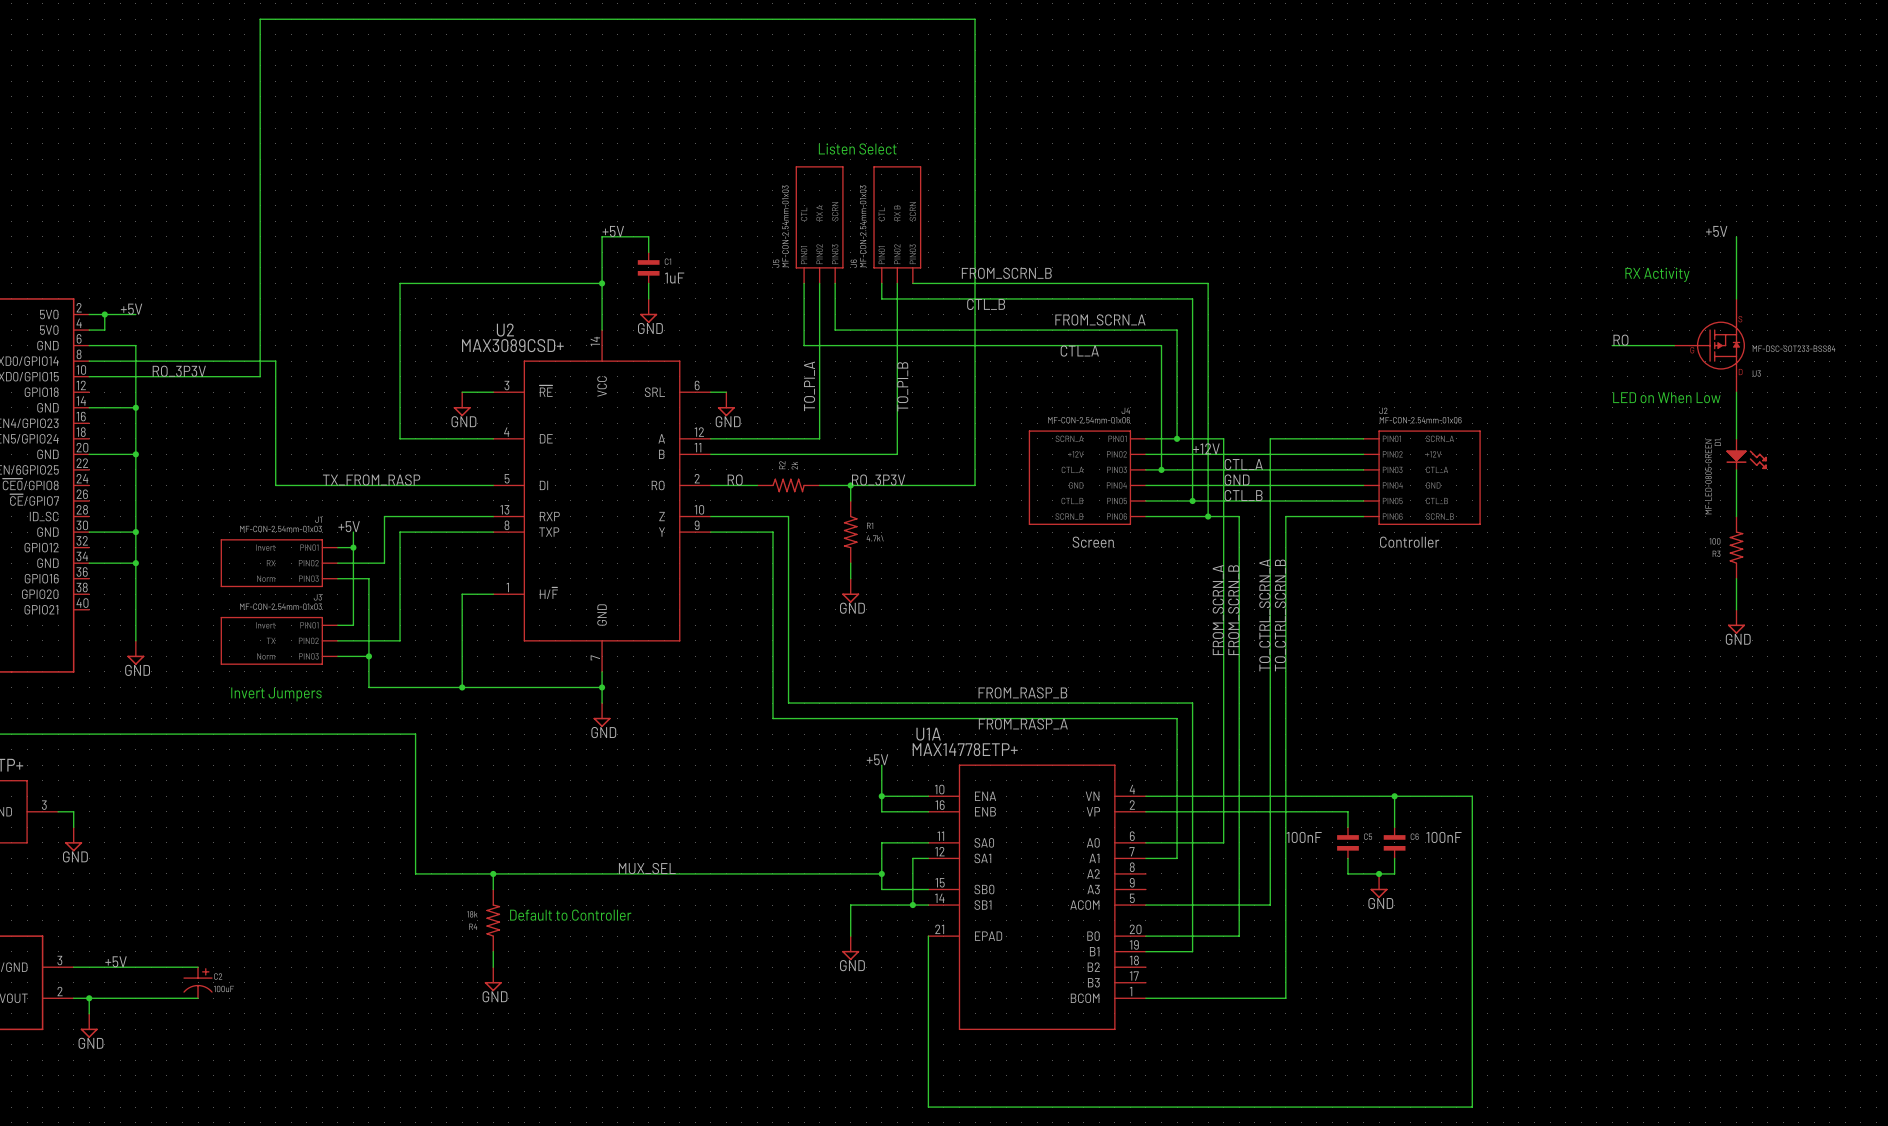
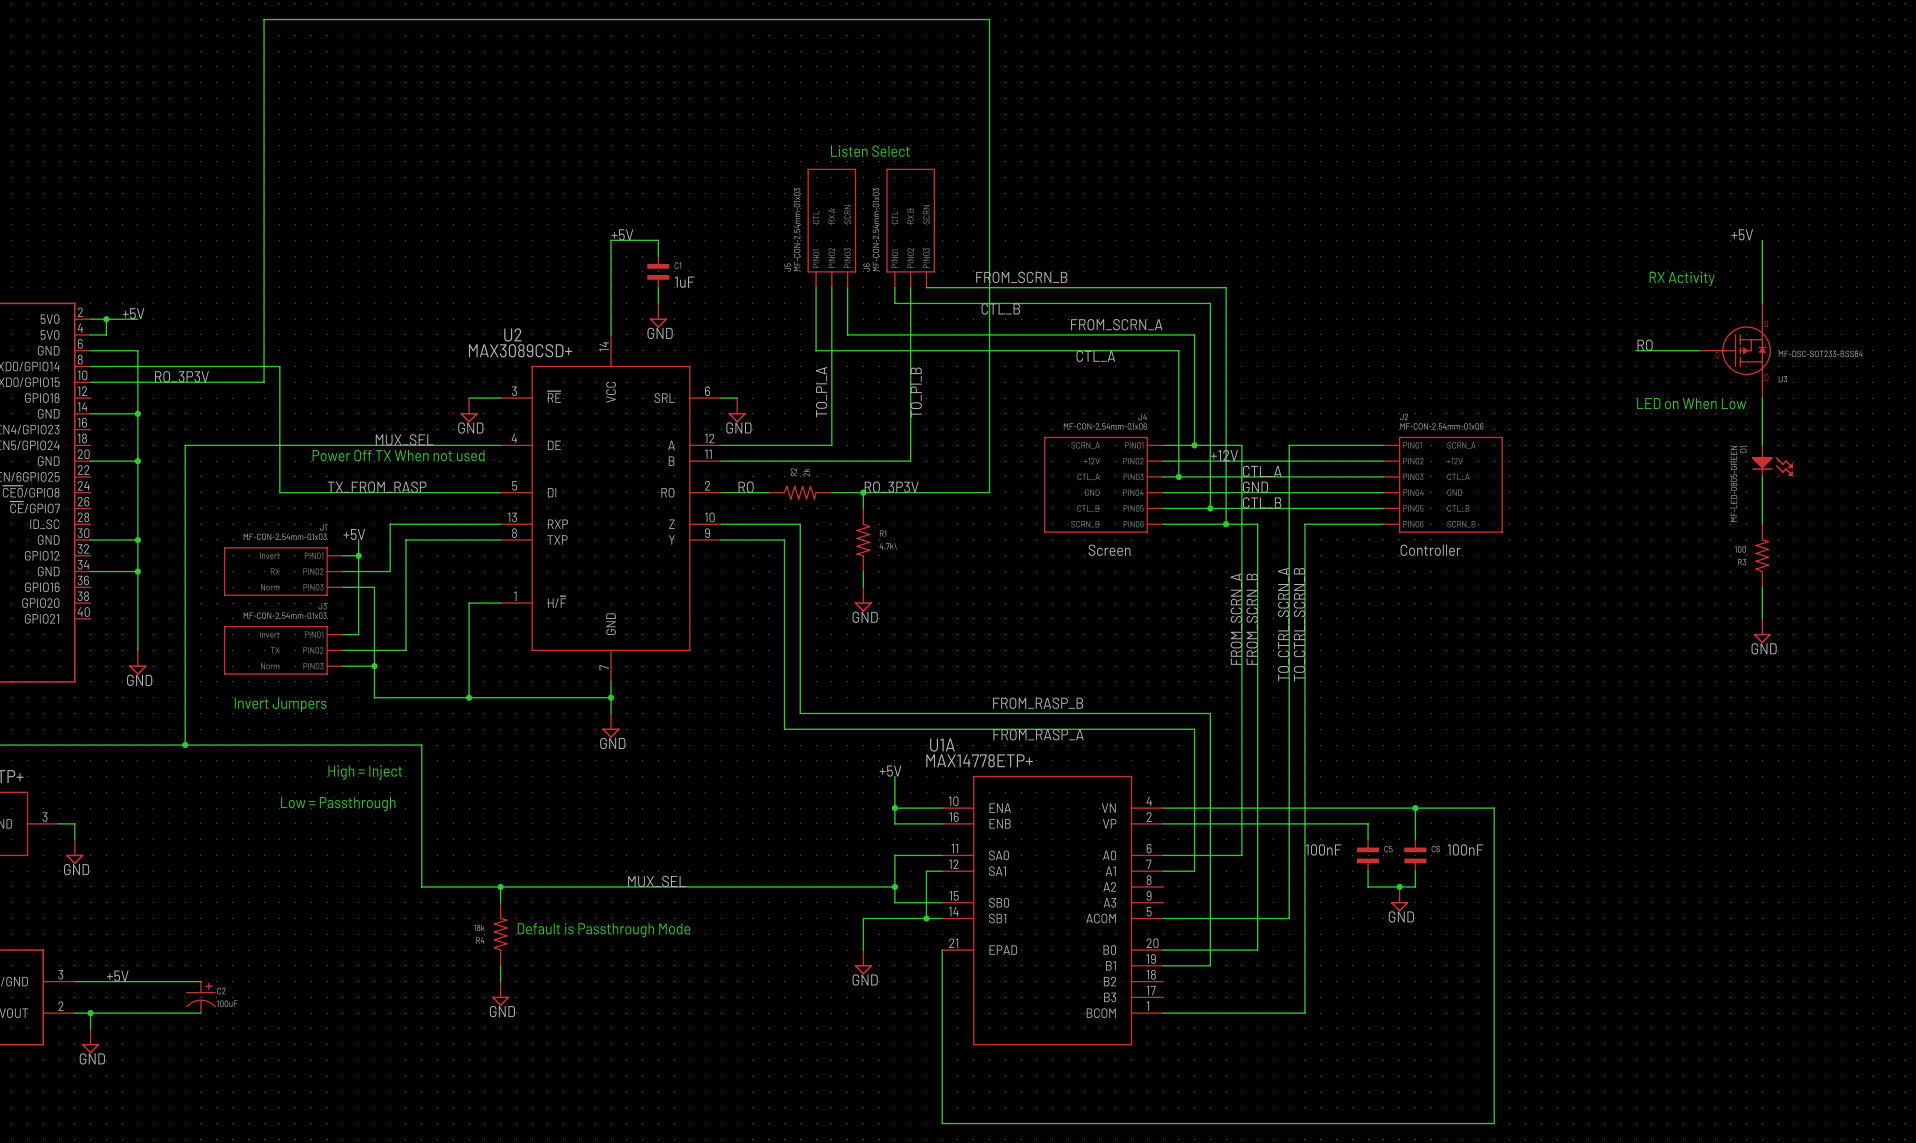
wire: (602, 283) (400, 283) (400, 438) -> (185, 745) (185, 445) (405, 445)
junction: (602, 283) -> none
label: none -> MUX_SEL (404, 439)
text: none -> Power Off TX When not used (398, 455)
junction: none -> (185, 745)
text: none -> High = Inject (365, 772)
text: none -> Low = Passthrough (338, 804)
text: Default to Controller (570, 915) -> Default is Passthrough Mode (603, 930)

